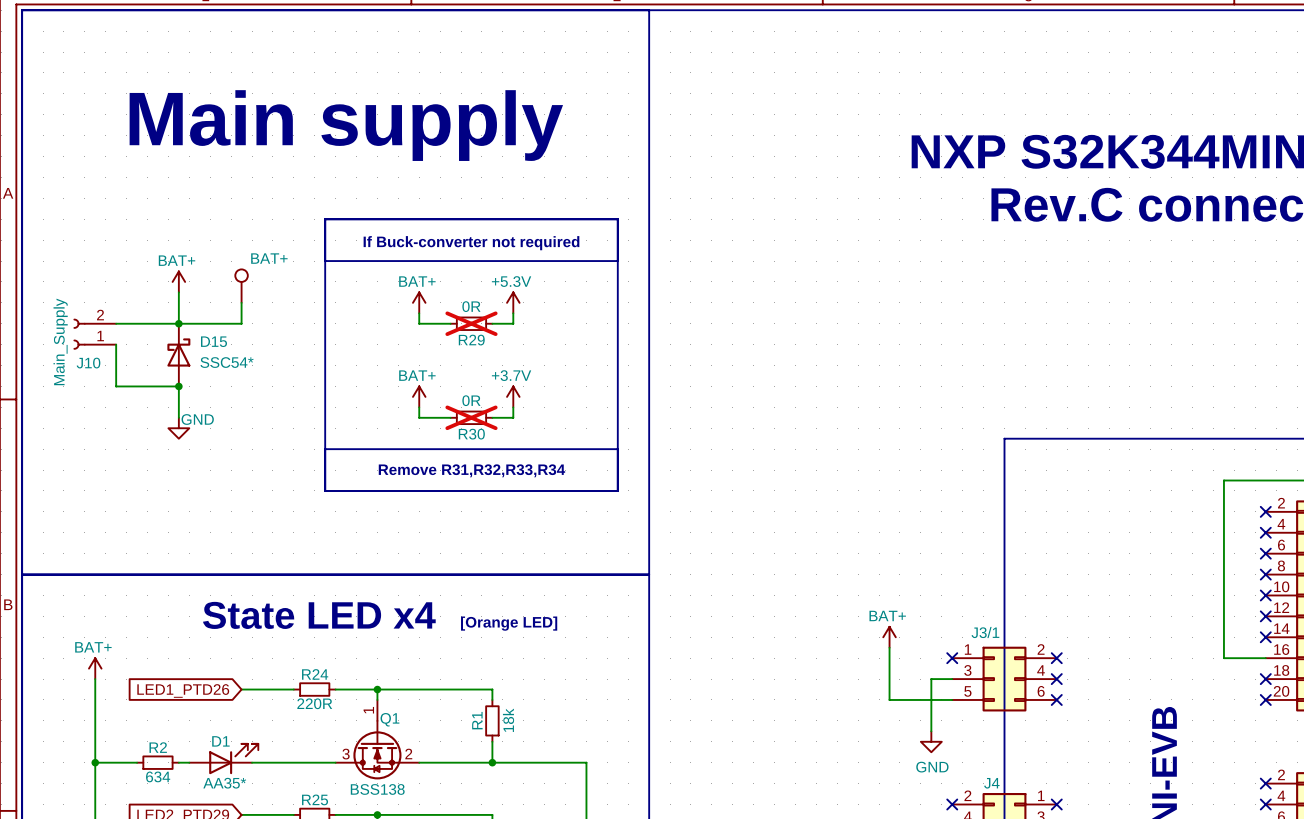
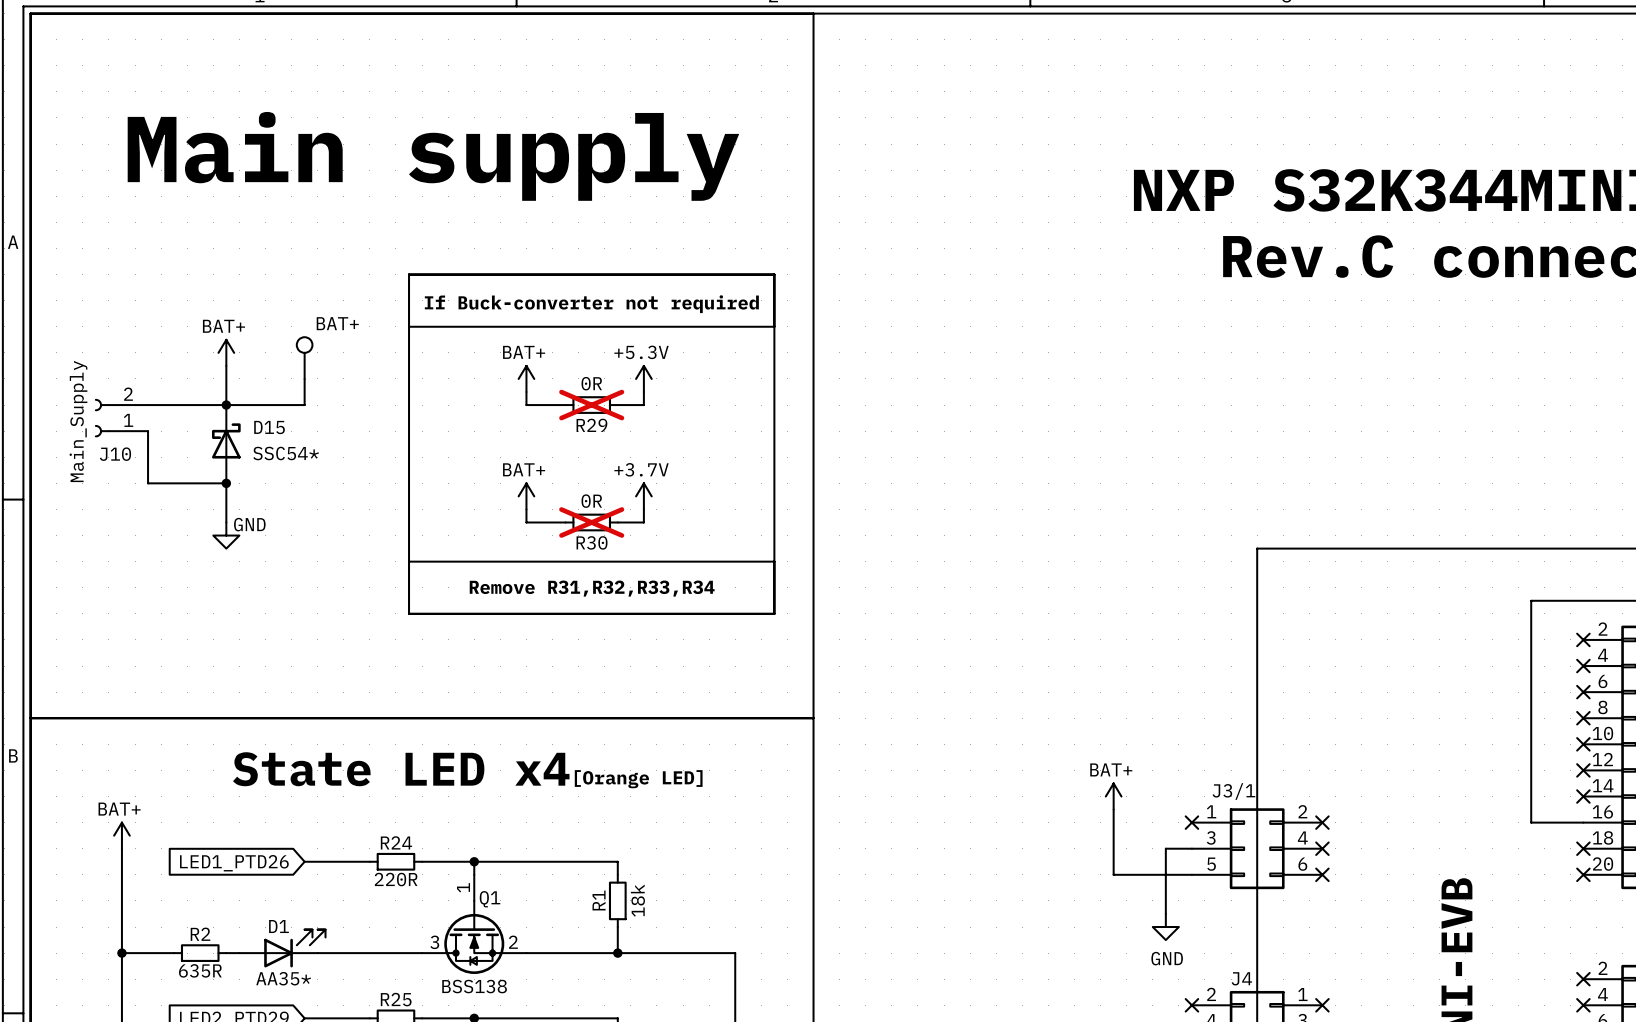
R2 value: 634 (158, 776) -> 635R (200, 970)

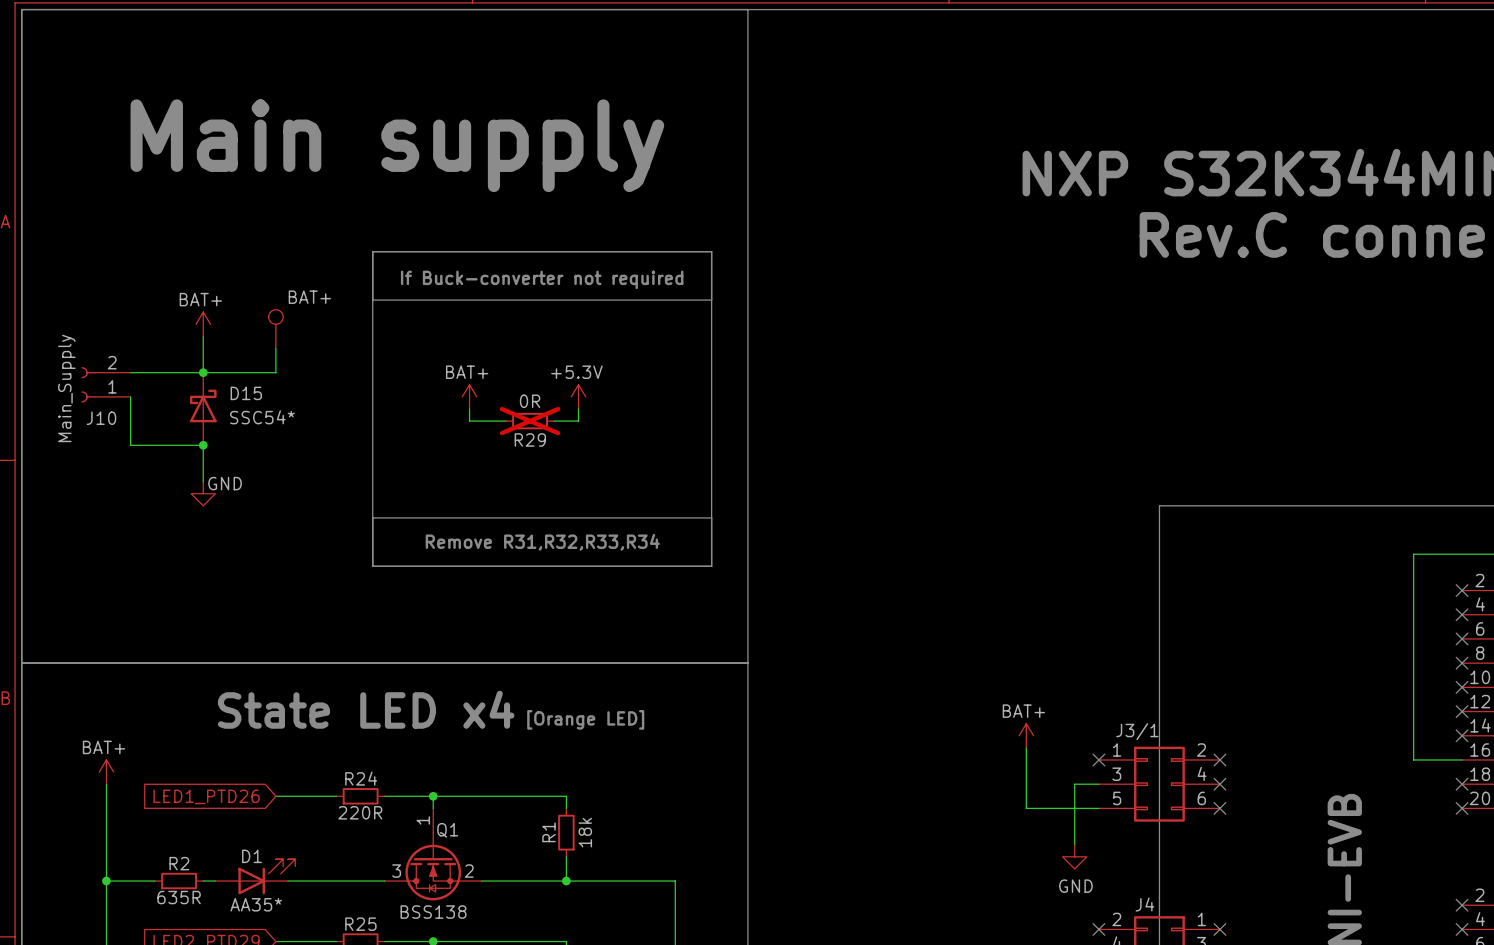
power symbol: BAT+ (526, 378) -> none
power symbol position: +5.3V (643, 378) -> +5.3V (578, 396)
wire: (526, 392) (526, 405) (565, 405) -> (469, 408) (469, 421) (505, 421)
wire: (643, 392) (643, 405) (617, 405) -> (578, 408) (578, 421) (554, 421)
R29 position: (591, 405) -> (530, 421)
power symbol: none -> BAT+ (469, 396)
power symbol: BAT+ (526, 496) -> none
power symbol: +3.7V (643, 496) -> none
wire: (526, 509) (526, 522) (565, 522) -> none
wire: (643, 509) (643, 522) (617, 522) -> none
R30: 0R (591, 522) -> none

